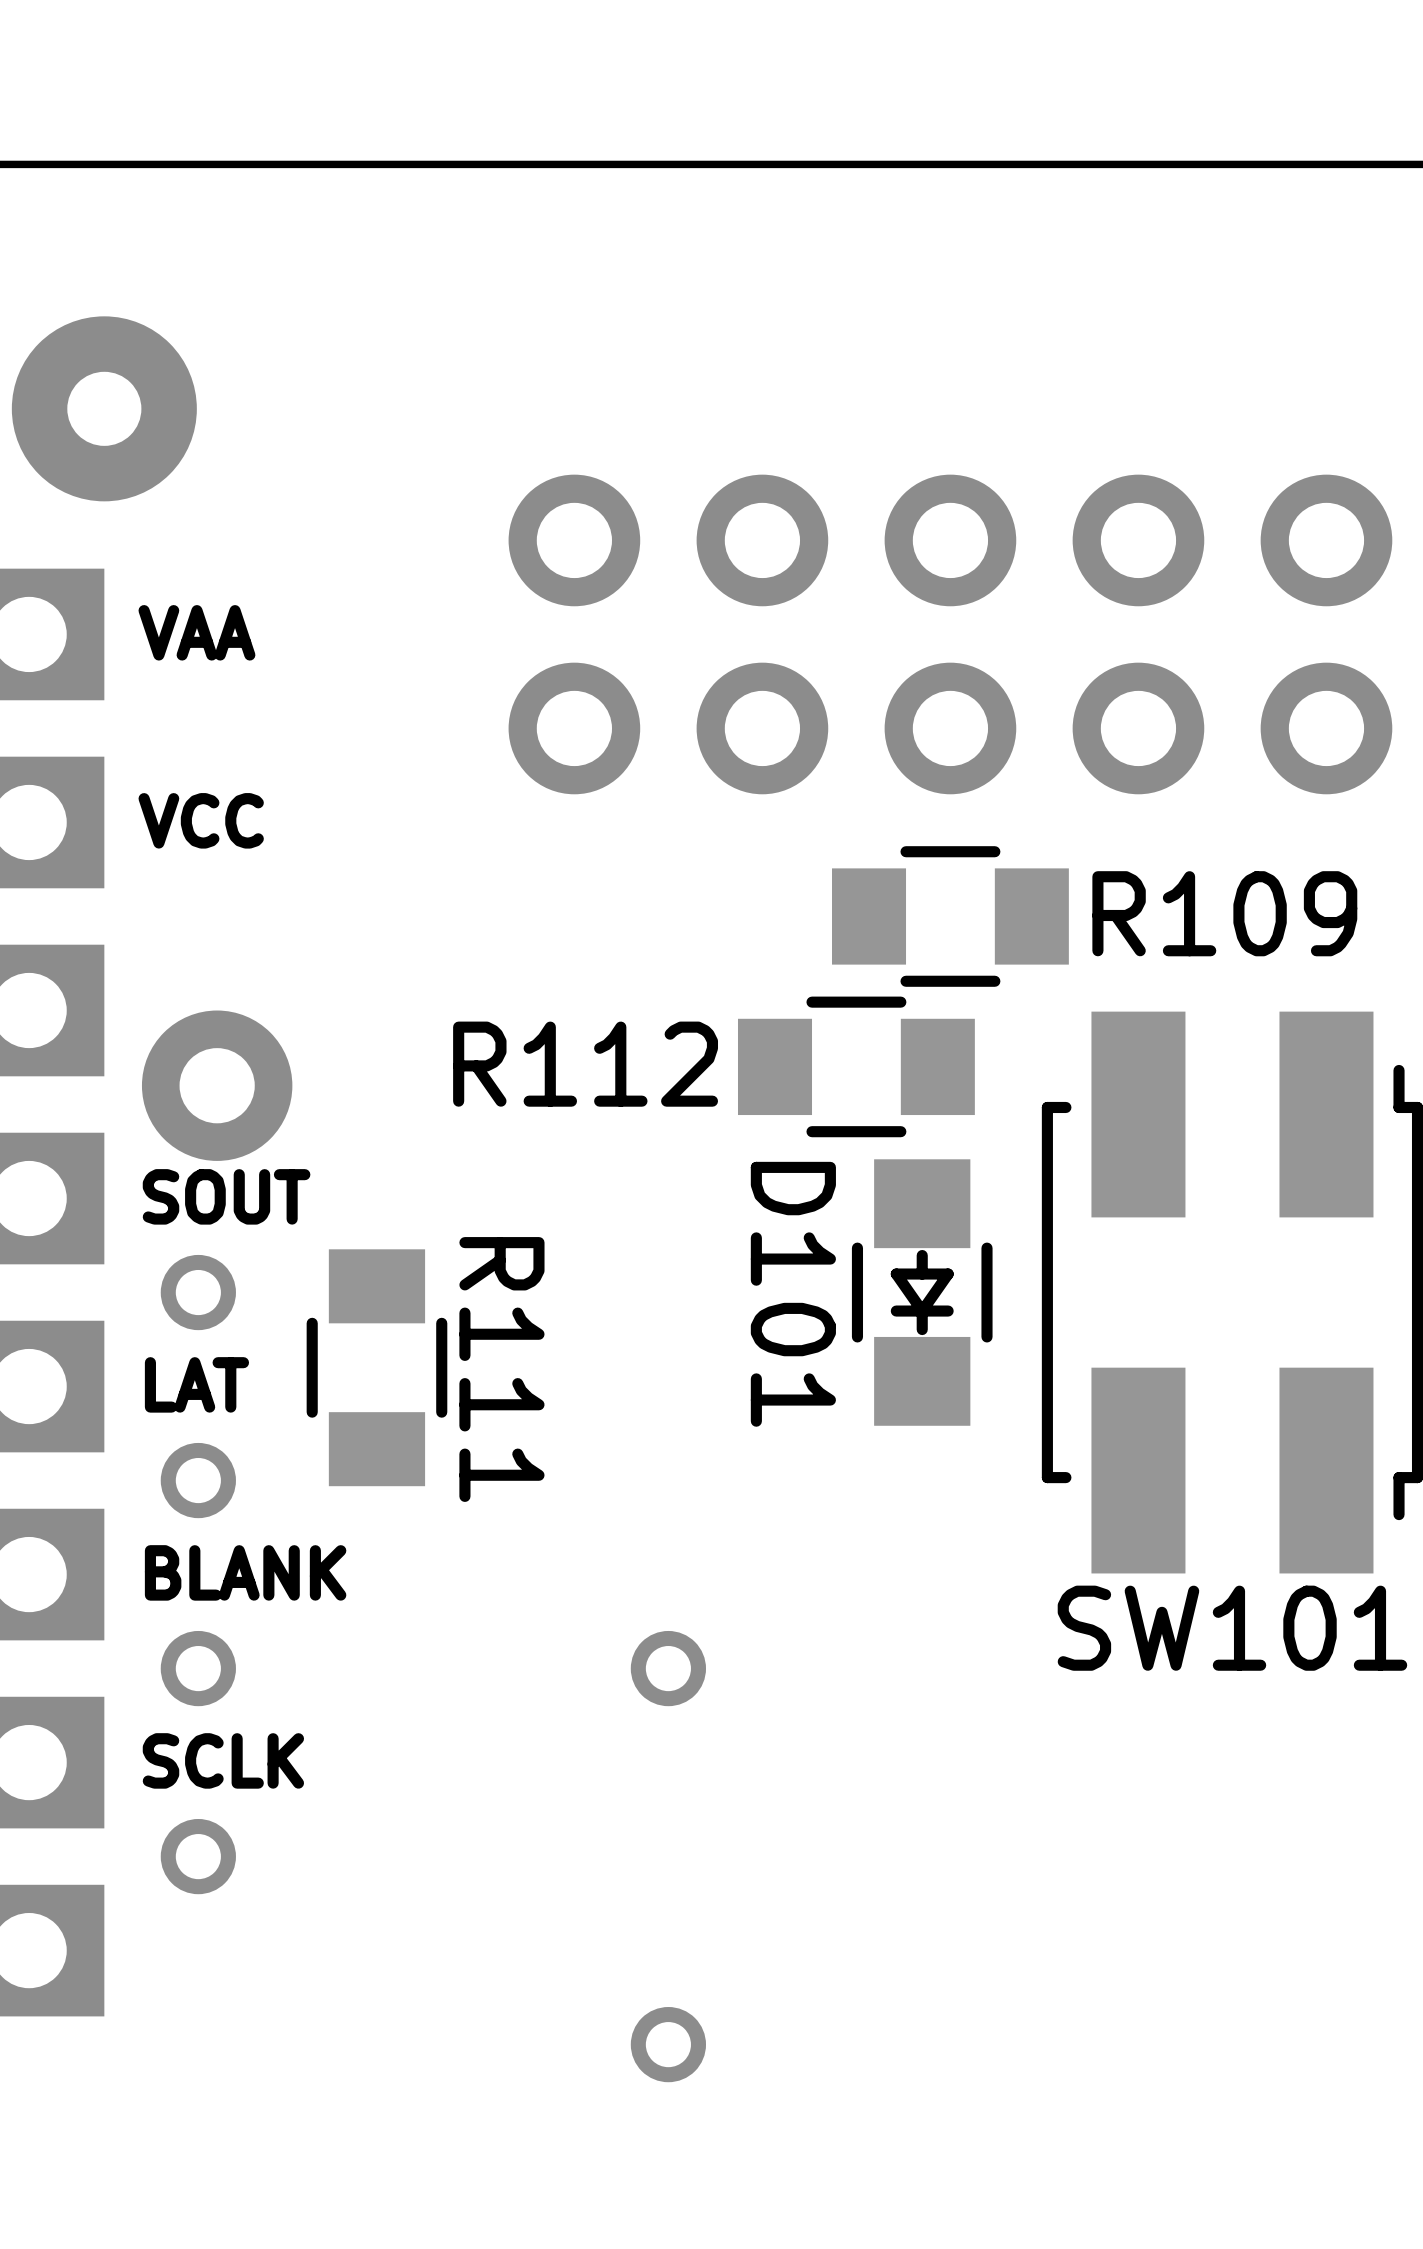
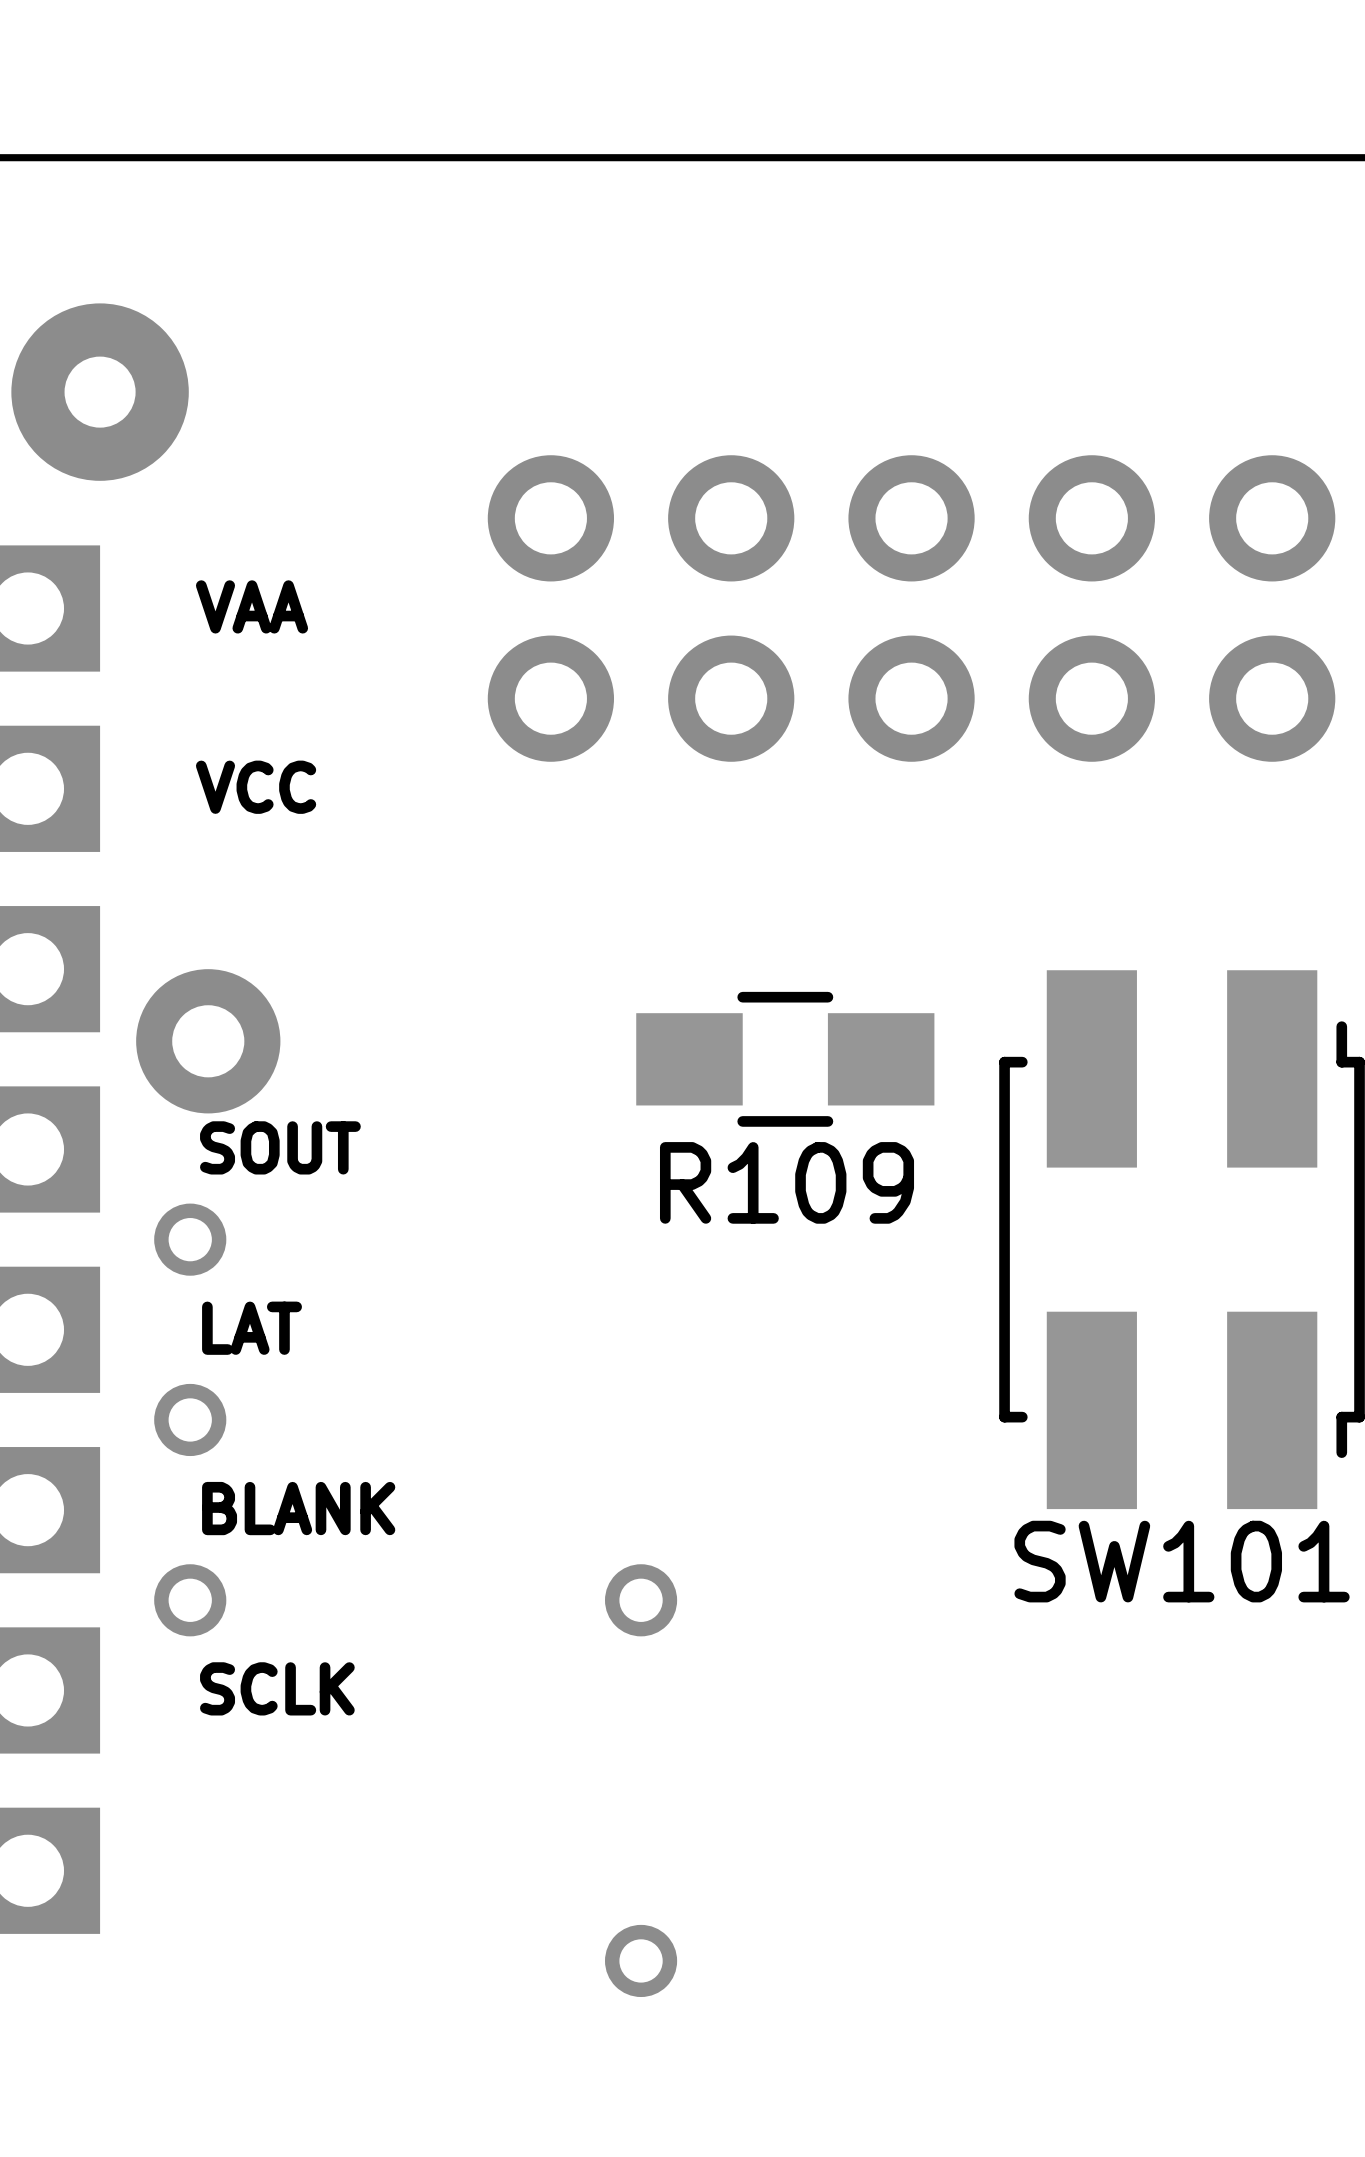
text position: VAA (196, 632) -> VAA (252, 606)
text position: VCC (201, 820) -> VCC (256, 787)
R109 footprint: [832, 846, 1069, 987] -> [636, 991, 935, 1127]
R109 name position: R109 (1224, 913) -> R109 (787, 1182)
R112: (856, 1066) -> none
text position: SOUT (226, 1196) -> SOUT (280, 1147)
D101: (922, 1292) -> none
R111: (376, 1367) -> none
text position: LAT (196, 1384) -> LAT (252, 1328)
text position: BLANK (245, 1572) -> BLANK (298, 1508)
text position: SCLK (223, 1760) -> SCLK (277, 1688)
part: (198, 1856) -> none

